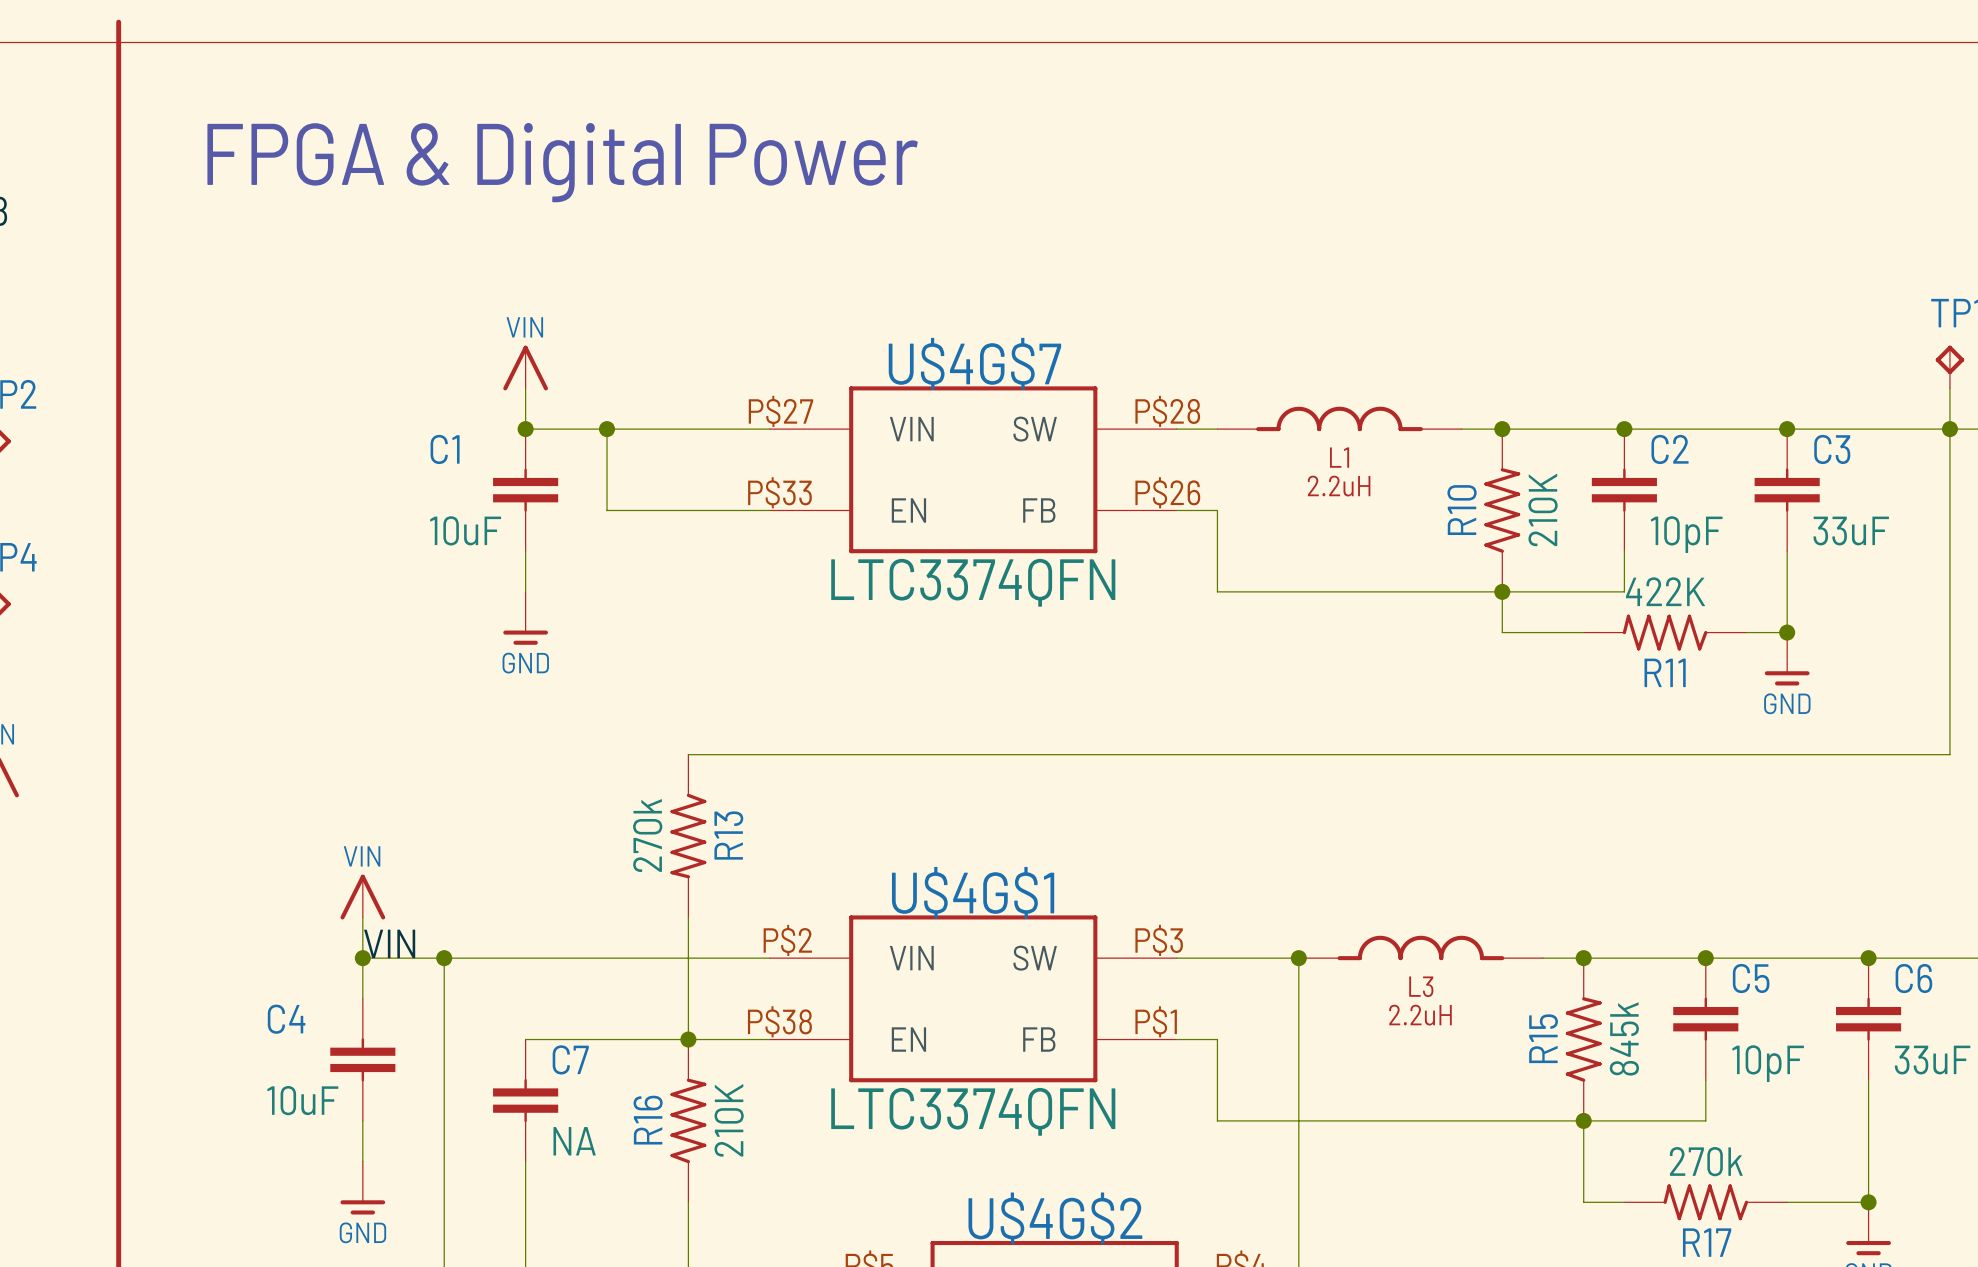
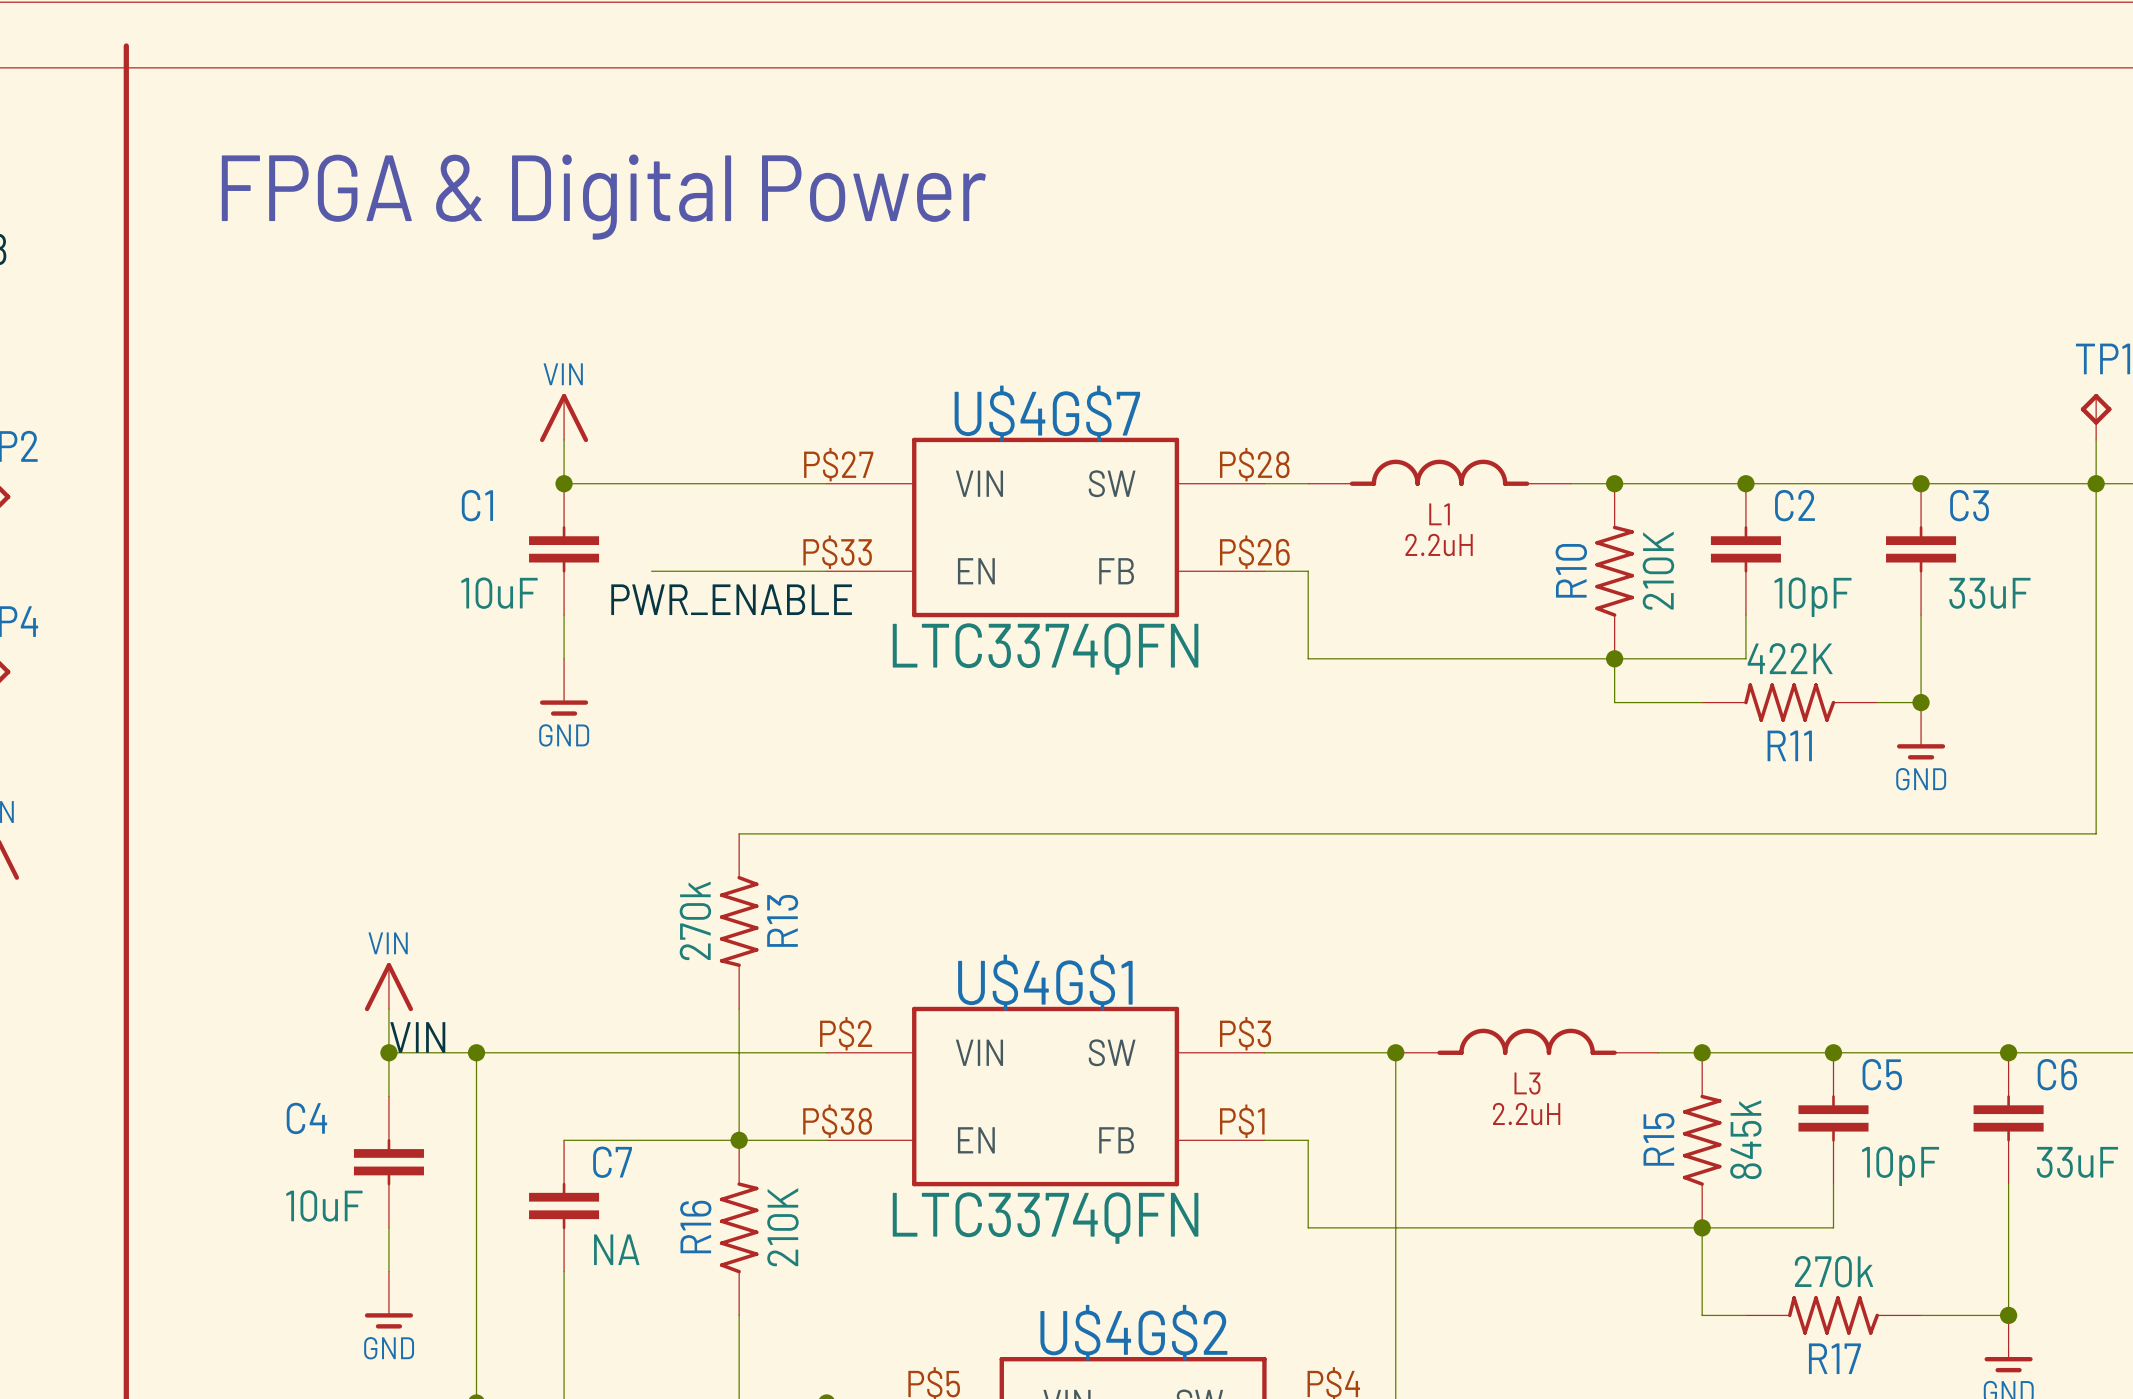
wire: (607, 429) (607, 510) -> none
junction: (607, 429) -> none
label: none -> PWR_ENABLE (731, 599)

